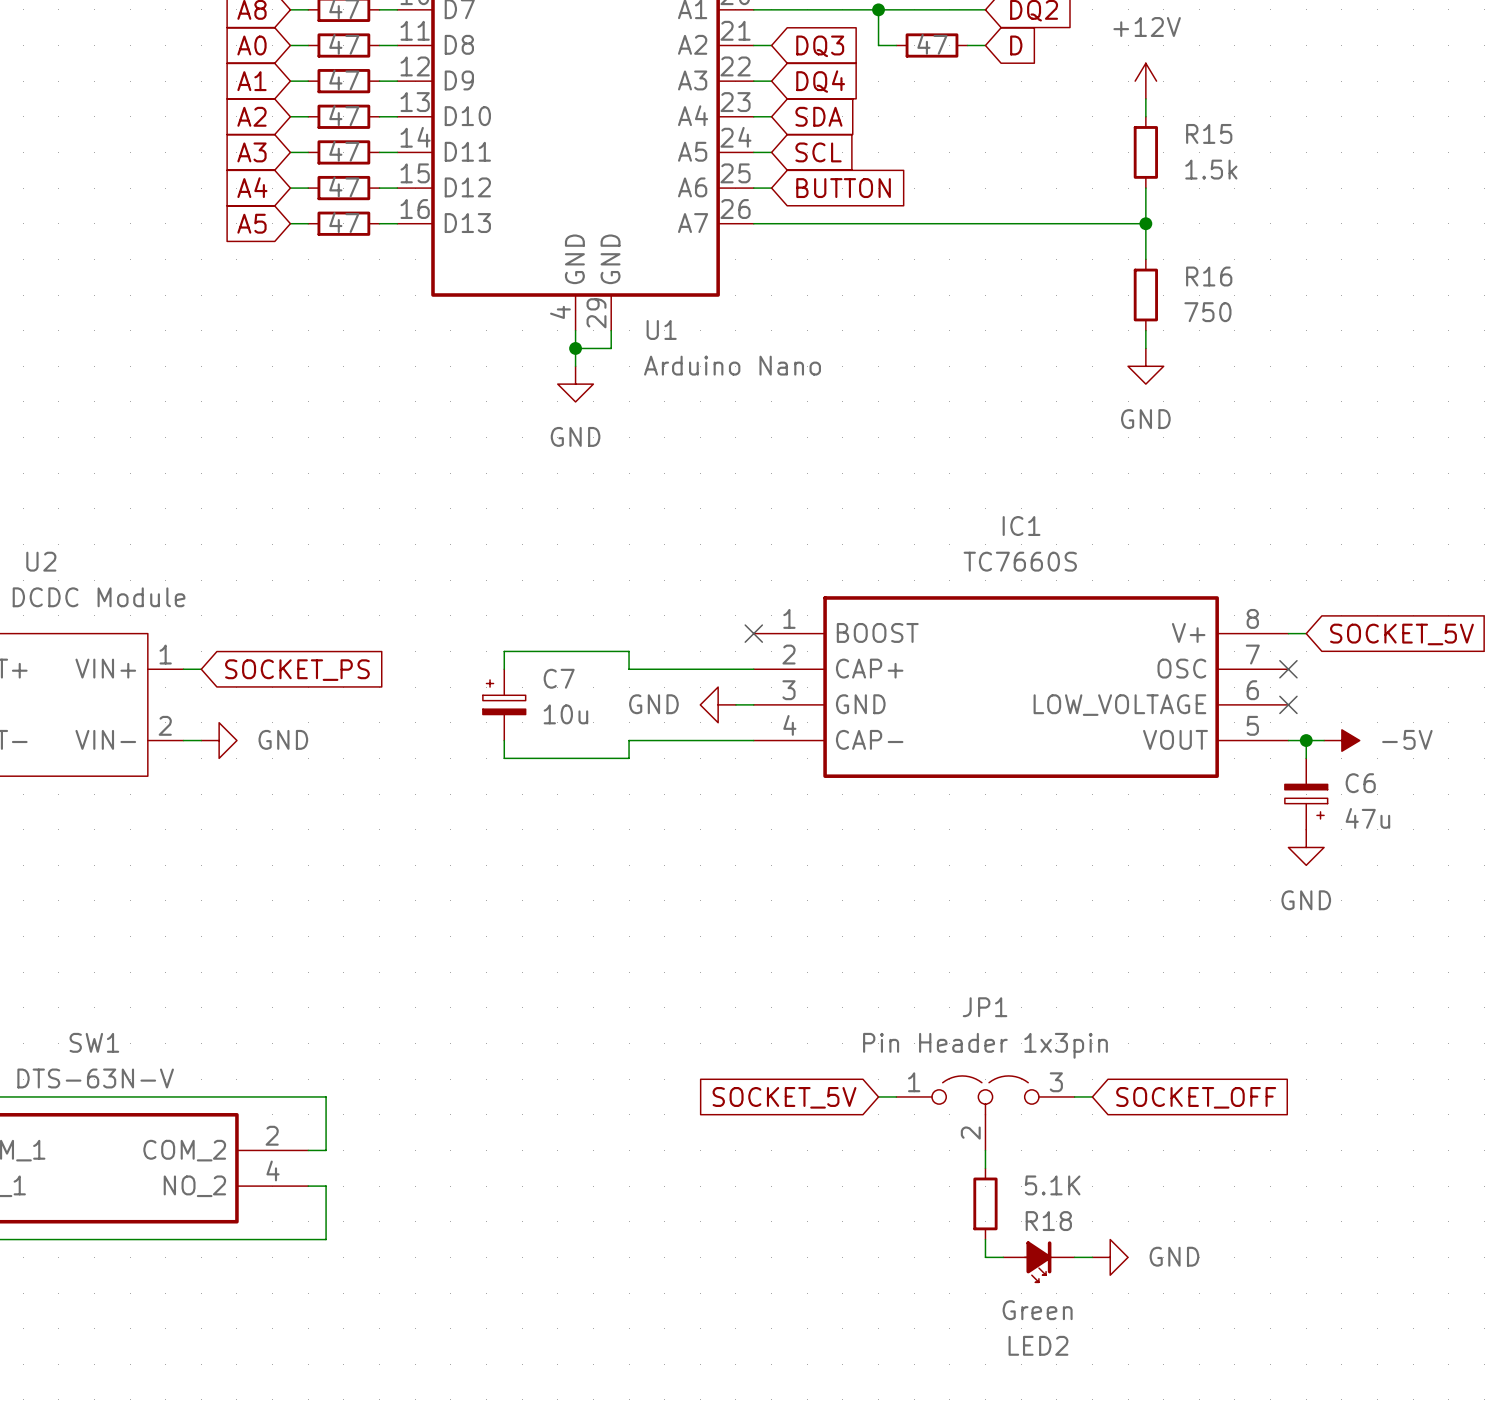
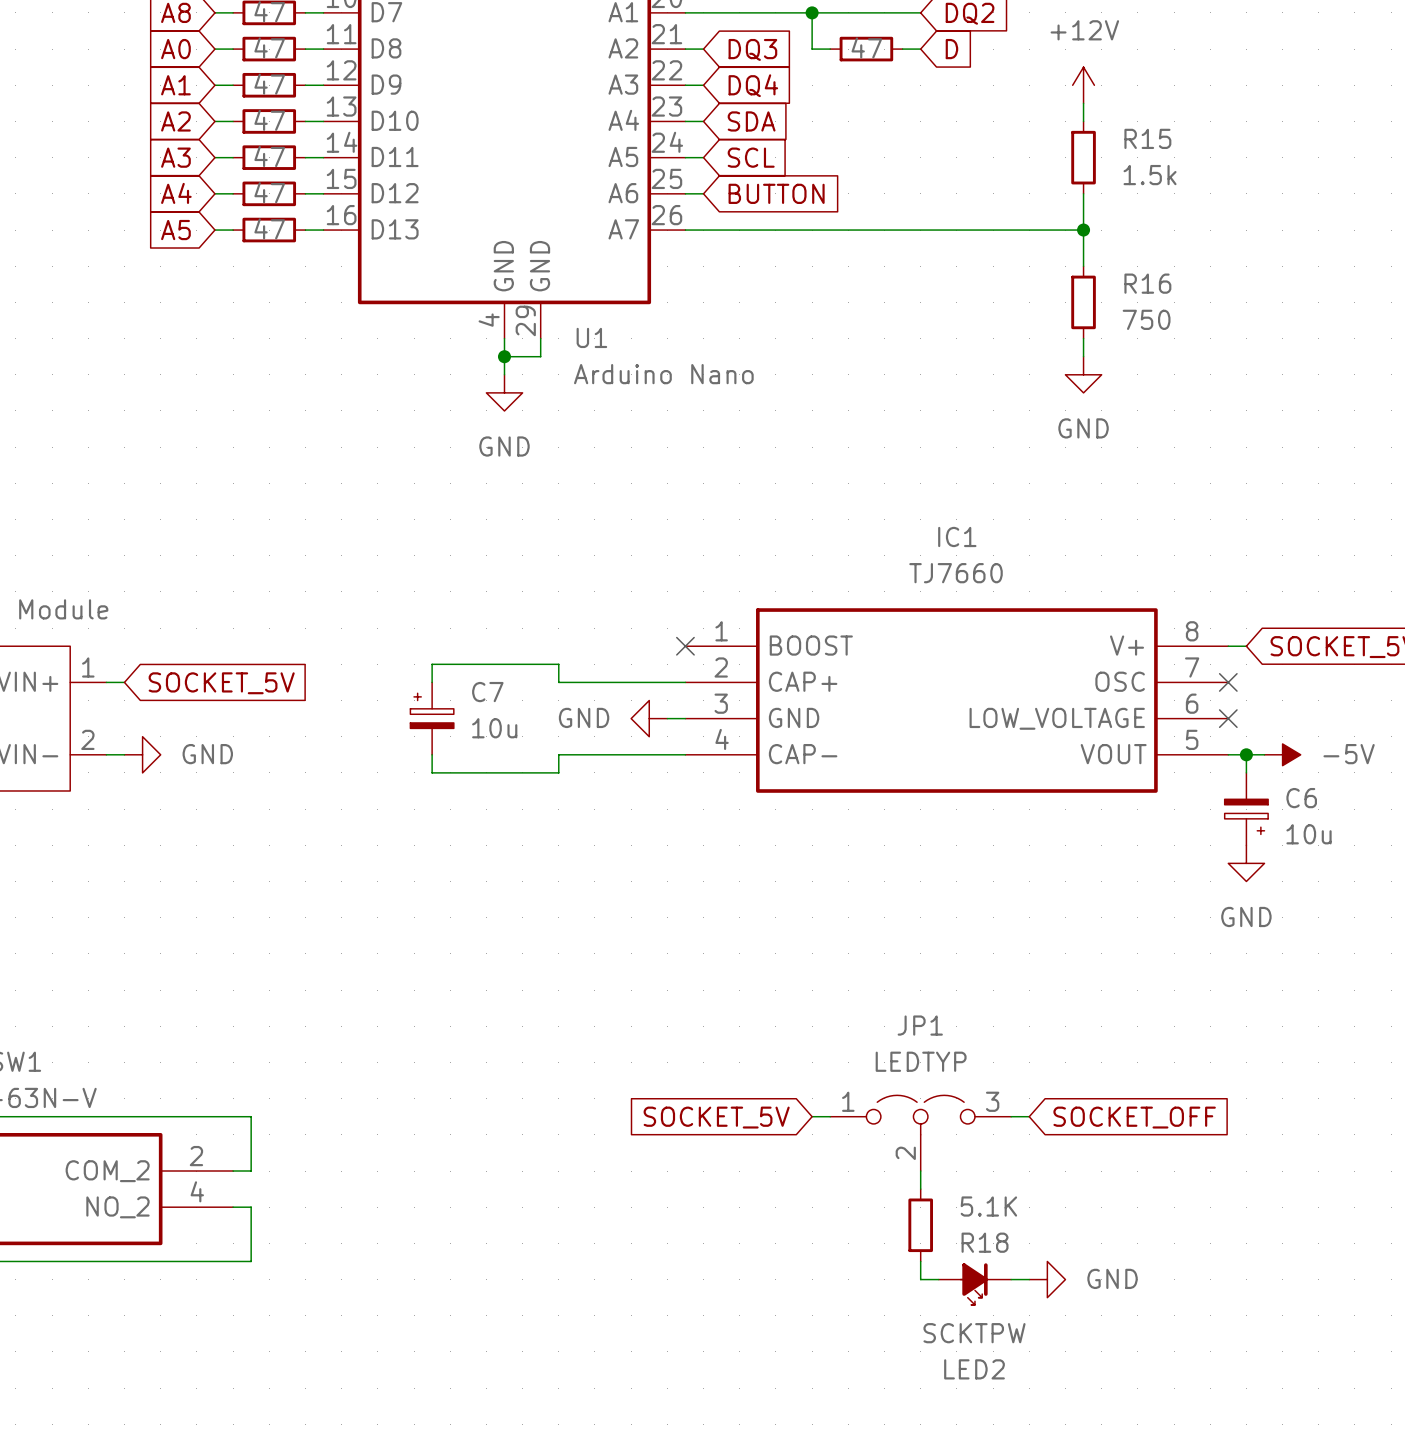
IC1 value: TC7660S (1020, 561) -> TJ7660 (956, 573)
global label: SOCKET_PS (297, 670) -> SOCKET_5V (221, 683)
C6 value: 47u (1367, 818) -> 10u (1309, 834)
JP1 value: Pin Header 1x3pin (985, 1045) -> LEDTYP (921, 1061)
LED2 value: Green (1037, 1310) -> SCKTPW (974, 1333)

